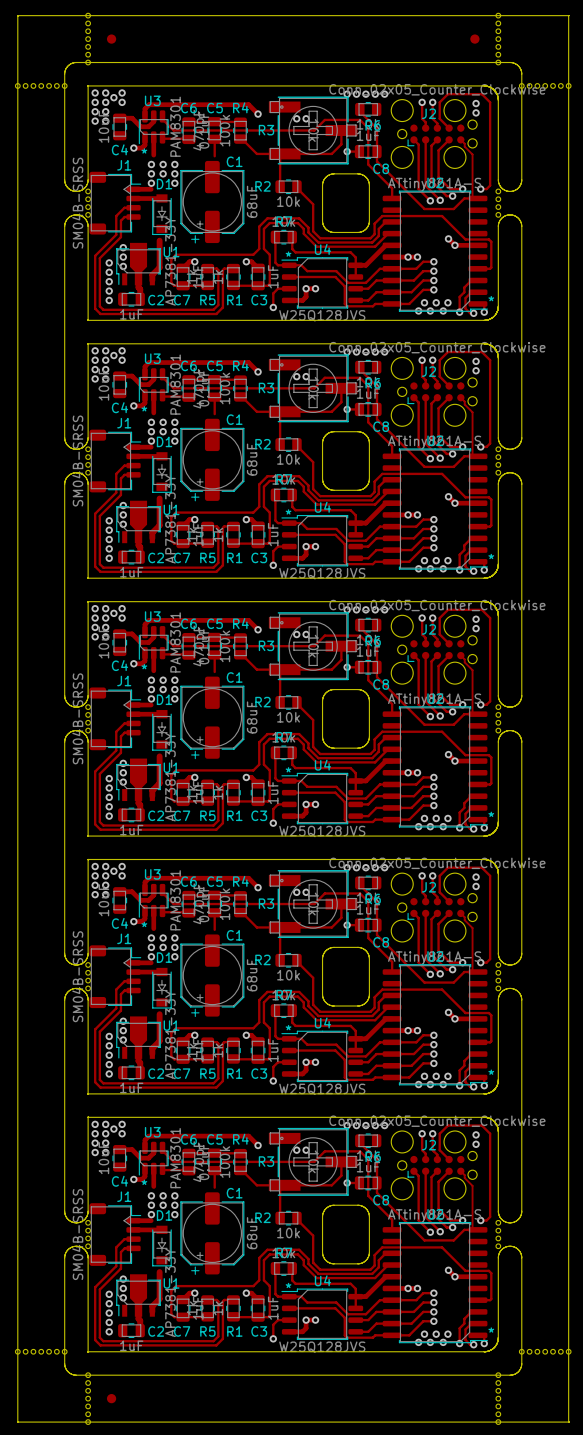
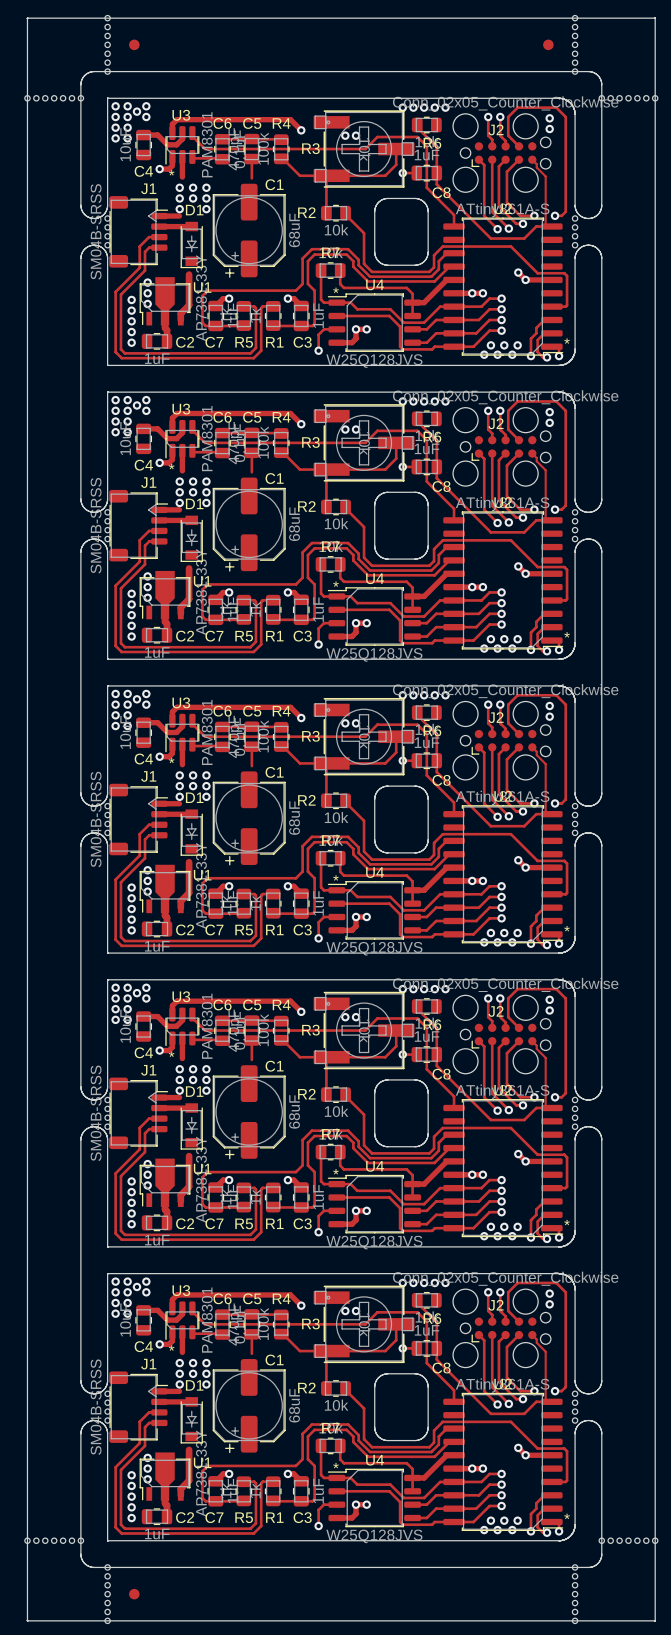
J1 footprint: [89, 171, 142, 235] -> [109, 196, 169, 268]
J1 footprint: [89, 429, 142, 493] -> [109, 489, 169, 562]
J1 footprint: [89, 687, 142, 751] -> [109, 783, 169, 856]
J1 footprint: [89, 945, 142, 1009] -> [109, 1077, 169, 1150]
J1 footprint: [89, 1203, 142, 1266] -> [109, 1371, 169, 1443]

